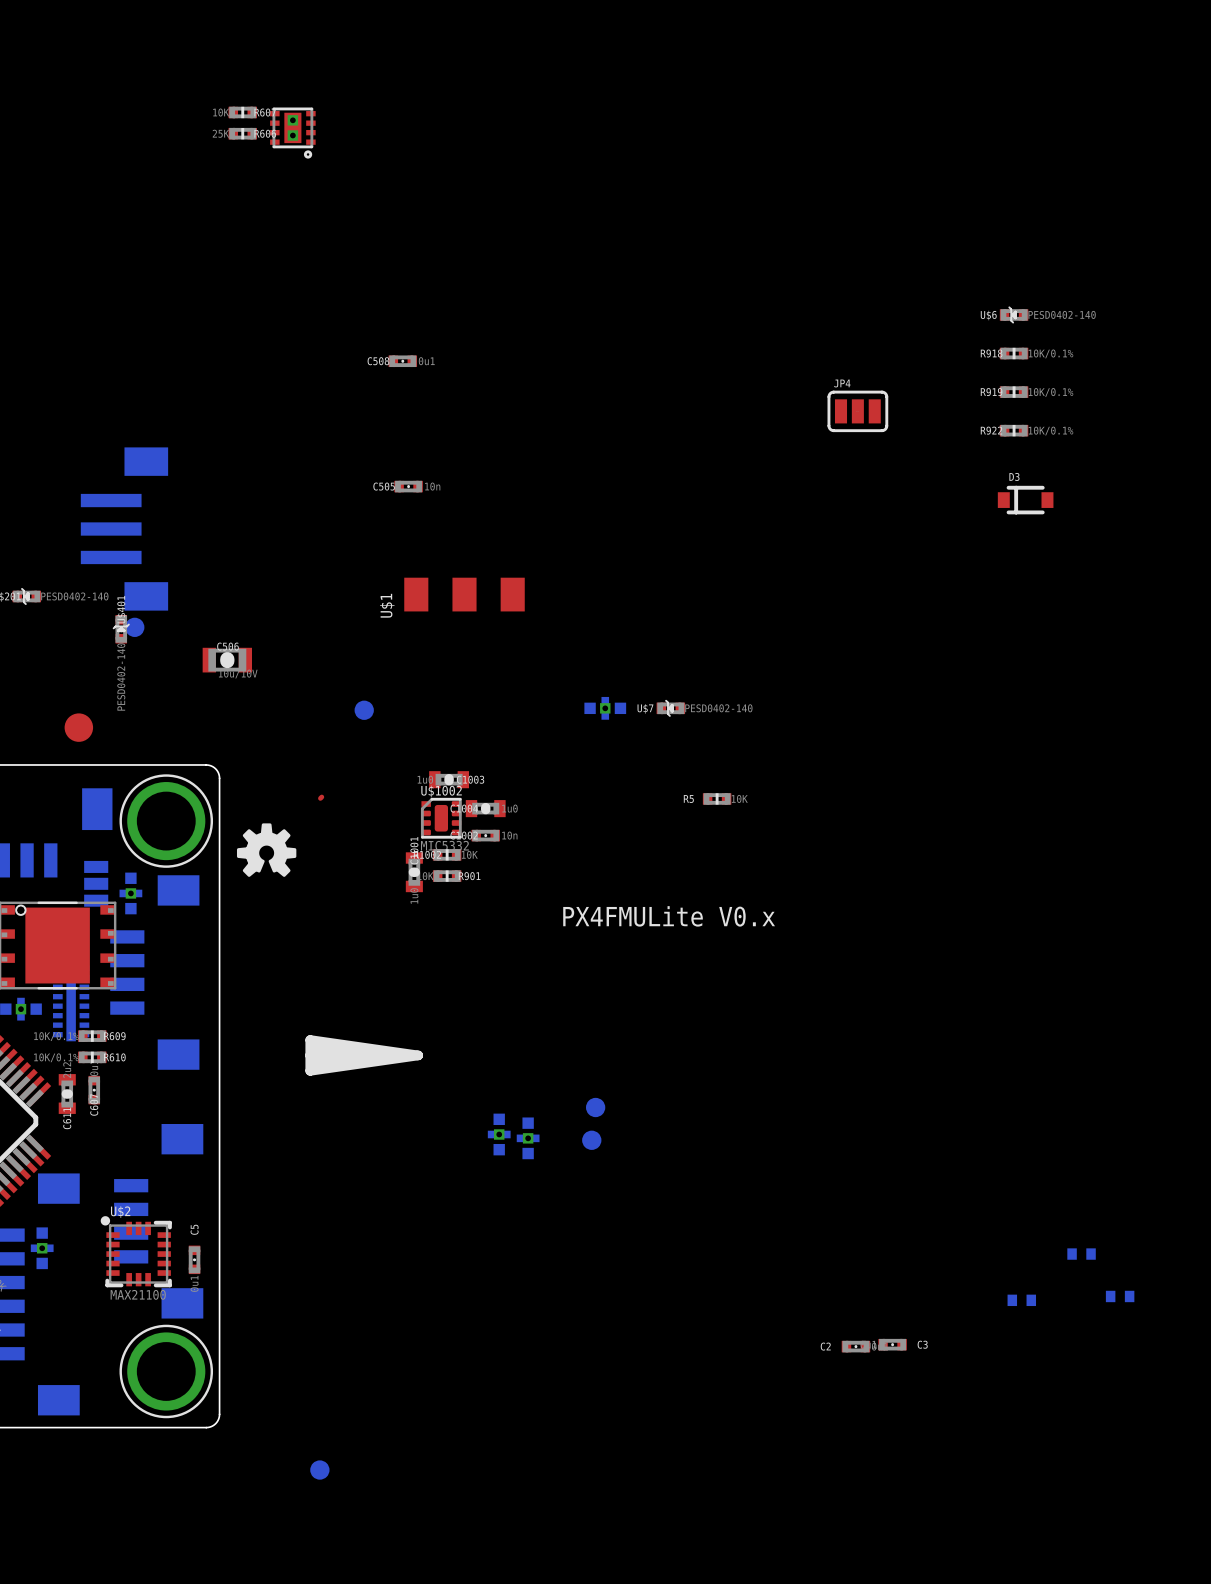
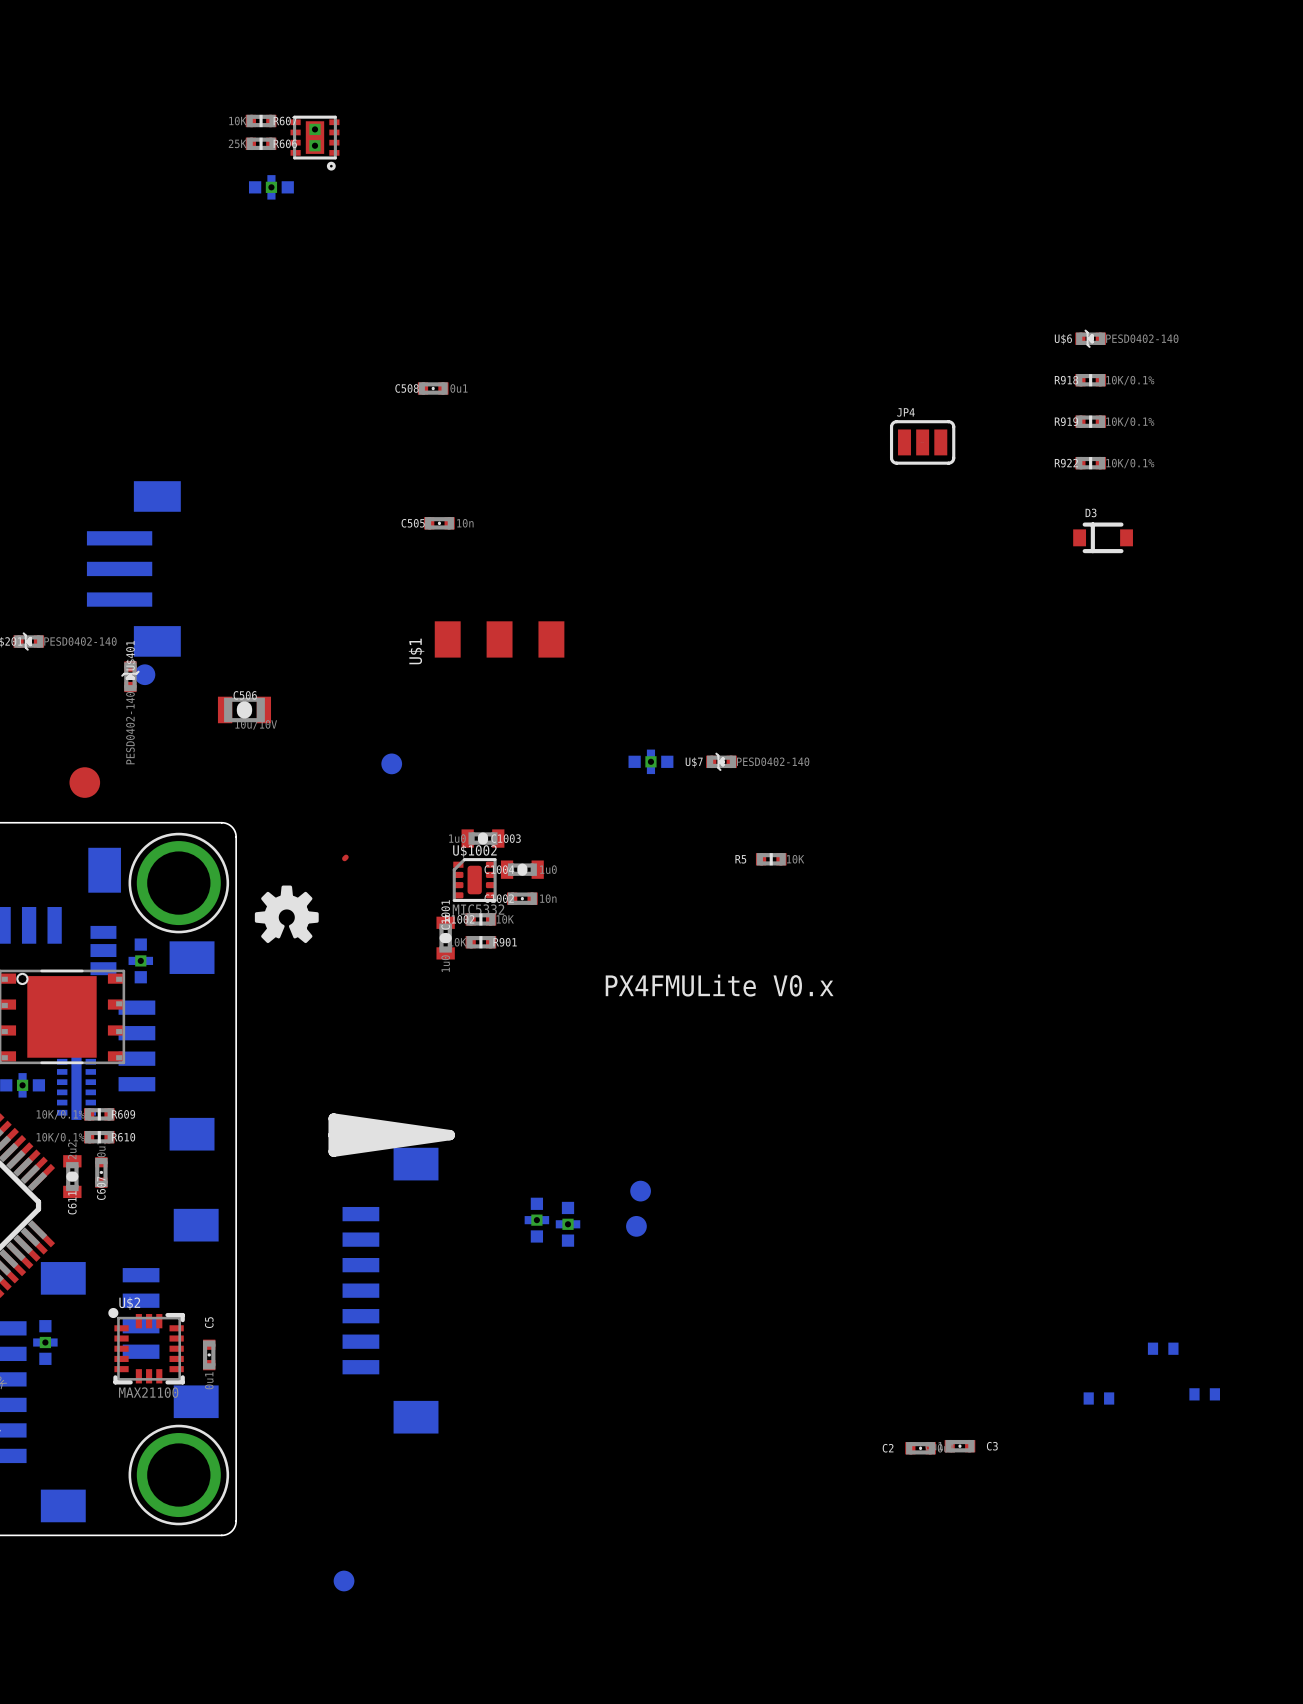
part: none -> (271, 187)
part: none -> (390, 1290)

